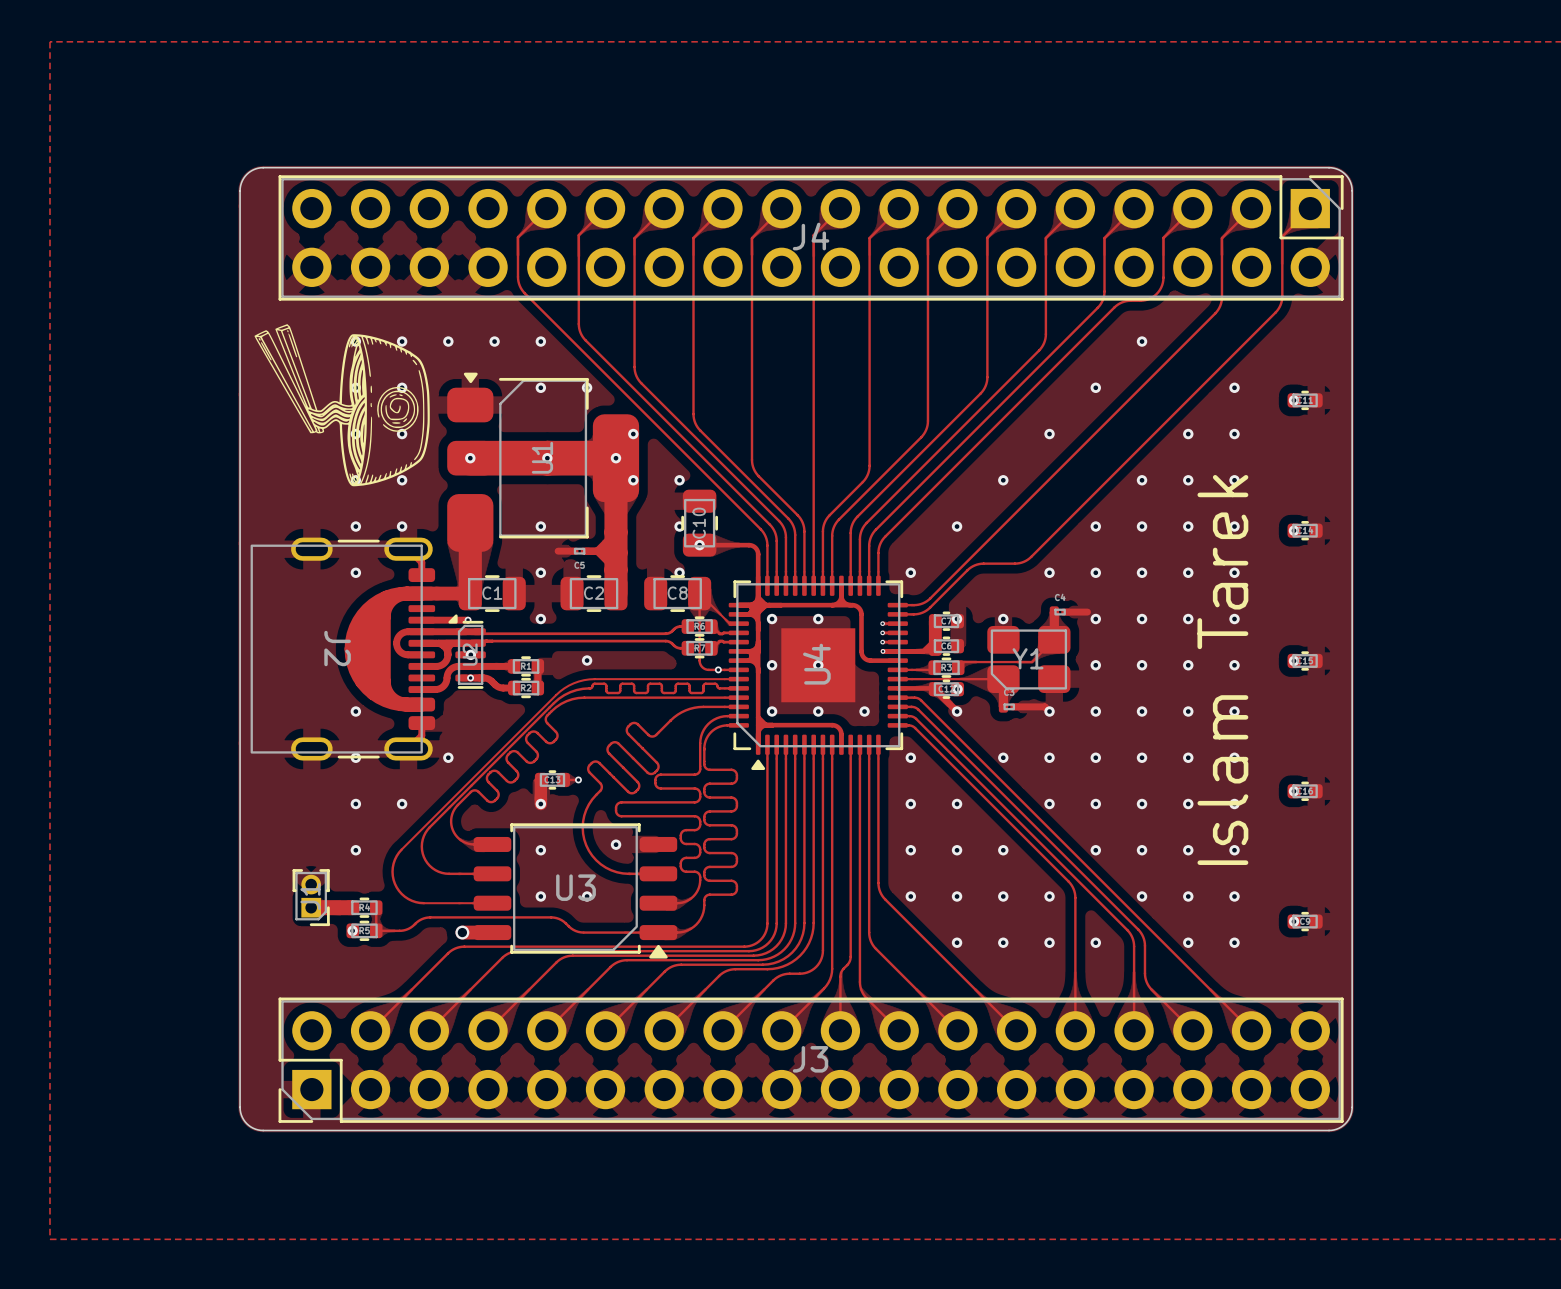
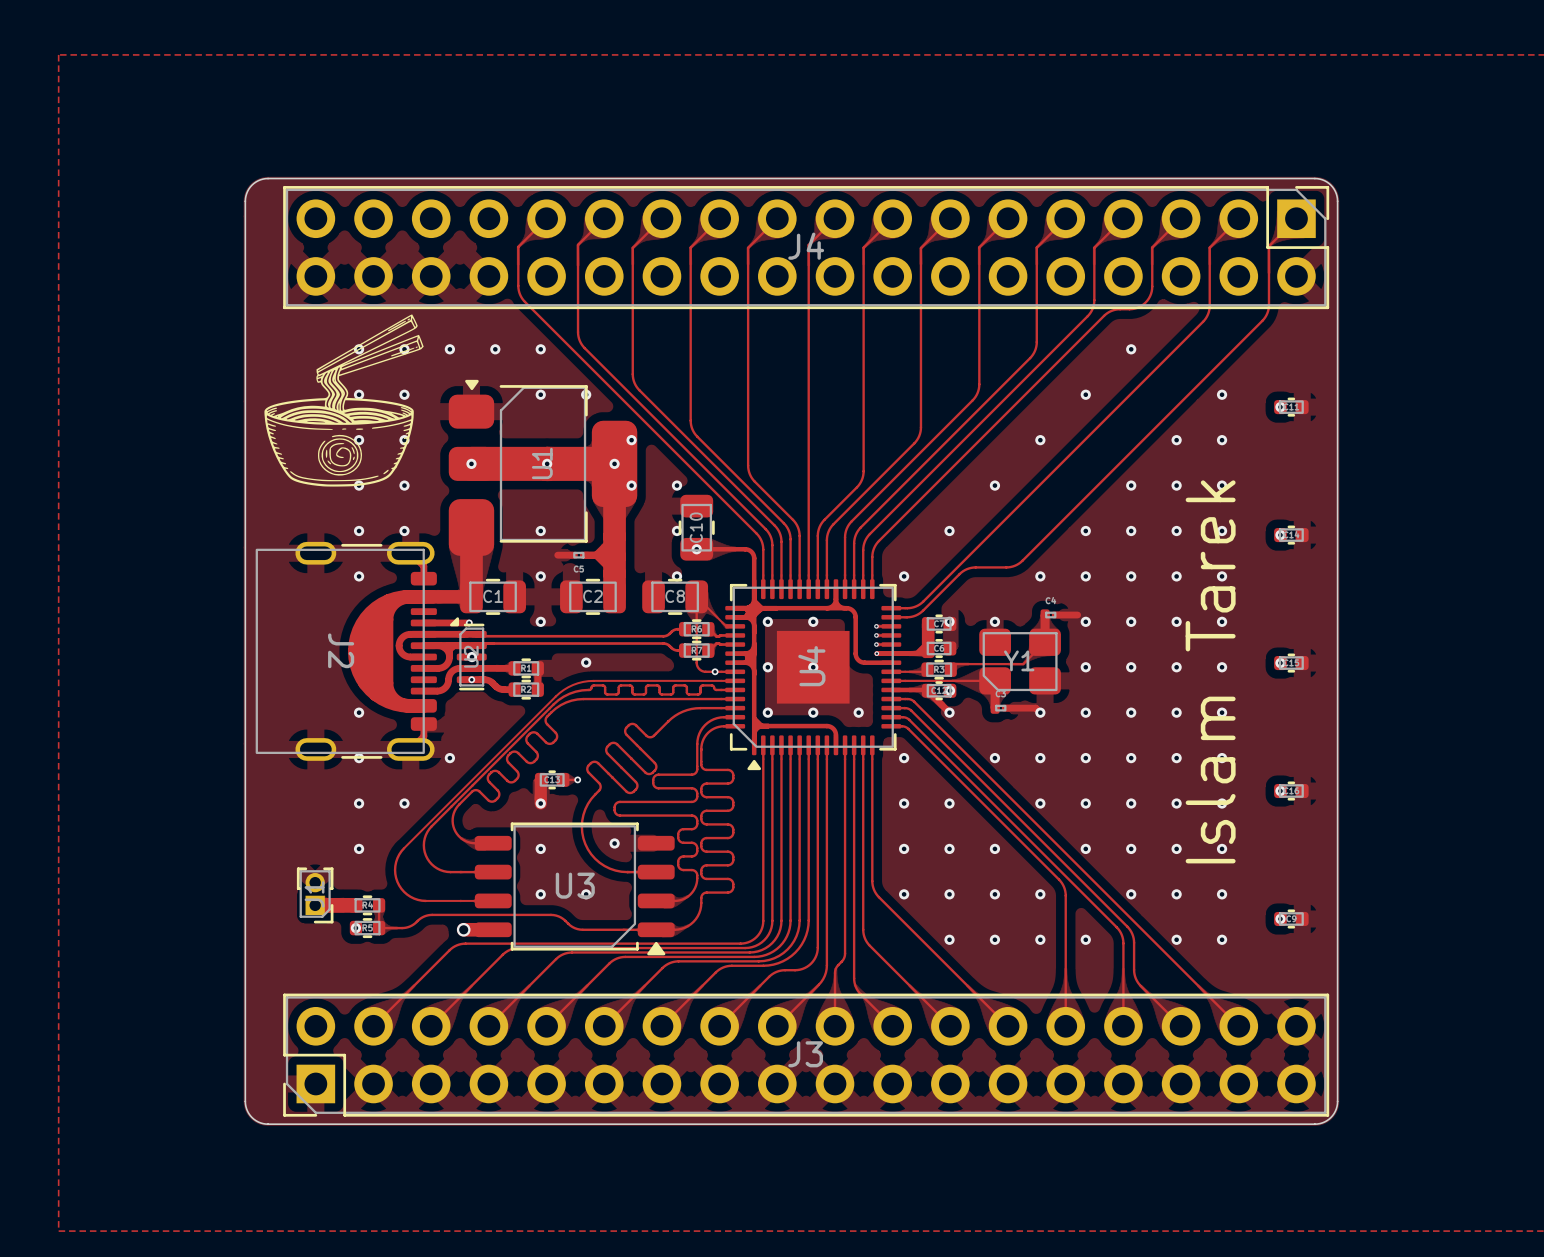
drawing shape: [254, 324, 430, 487] -> [264, 314, 424, 487]

